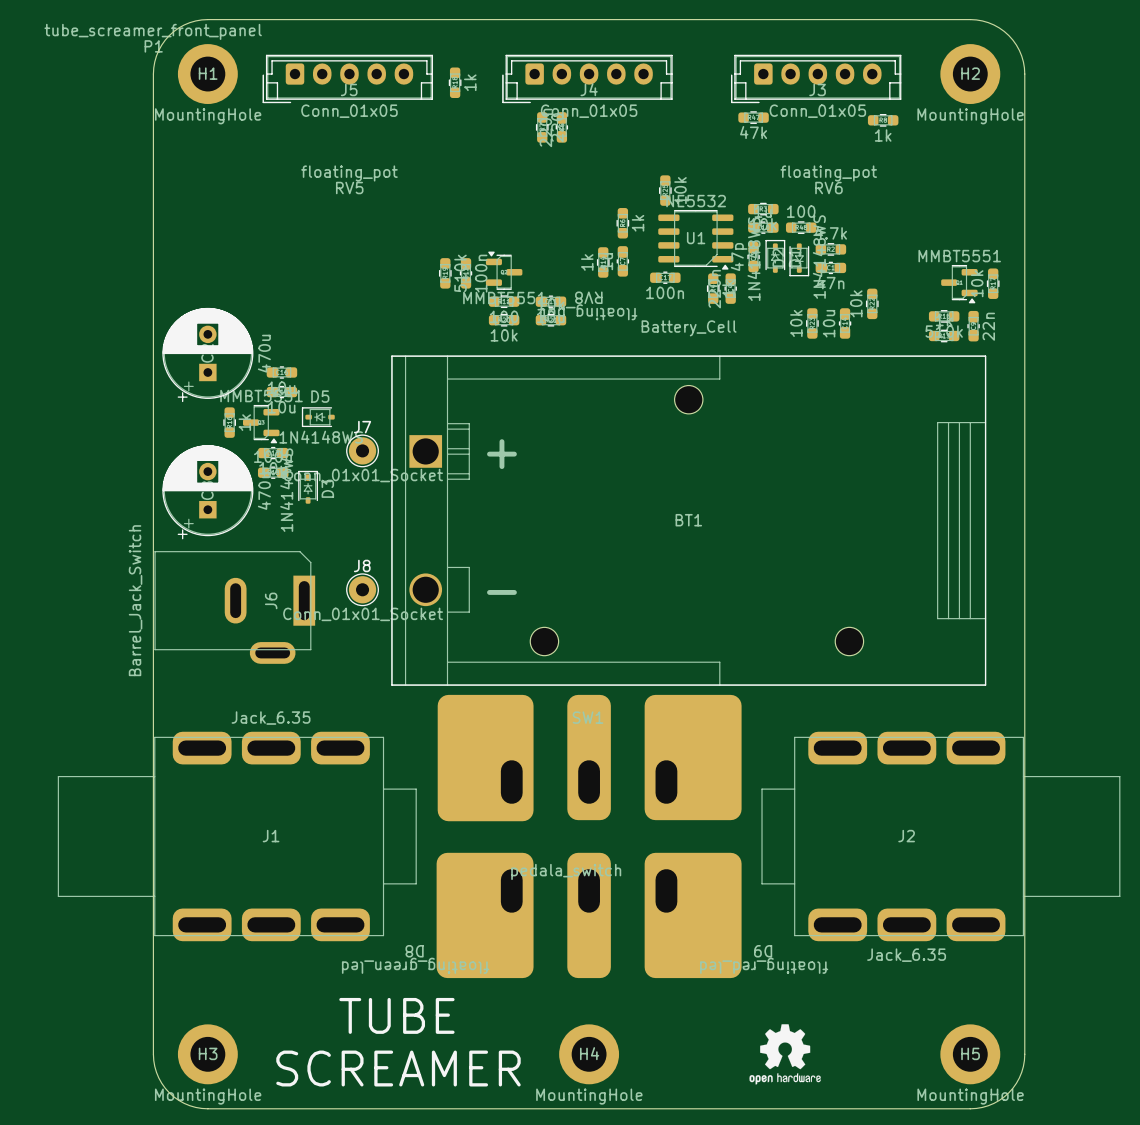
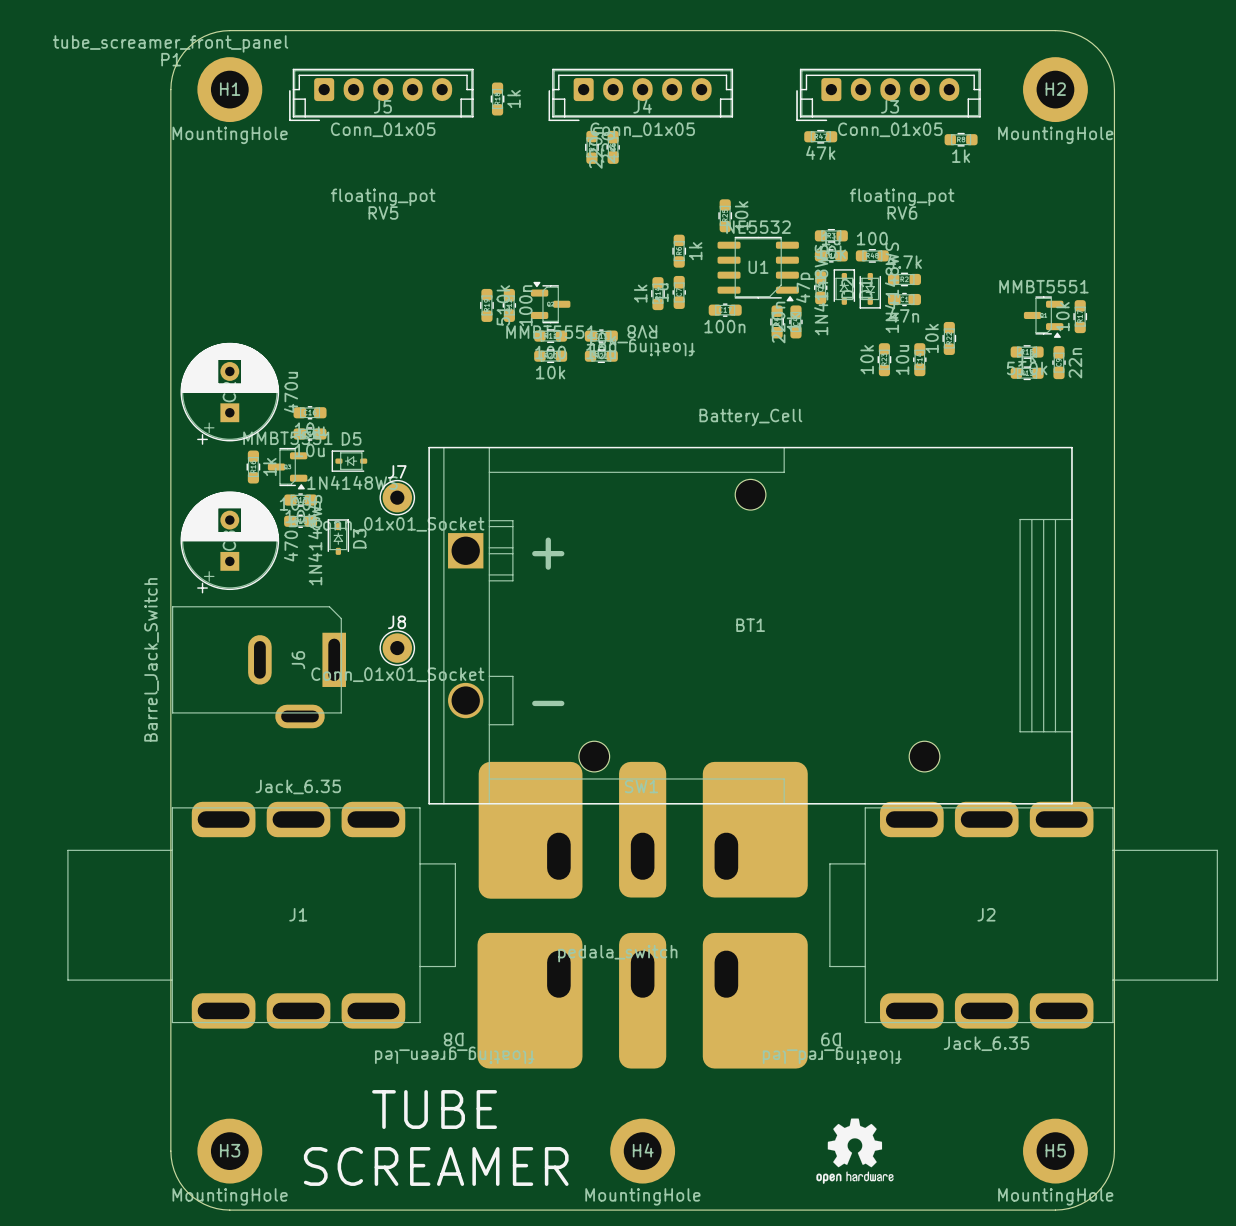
BT1 position: (688, 520) -> (750, 625)

